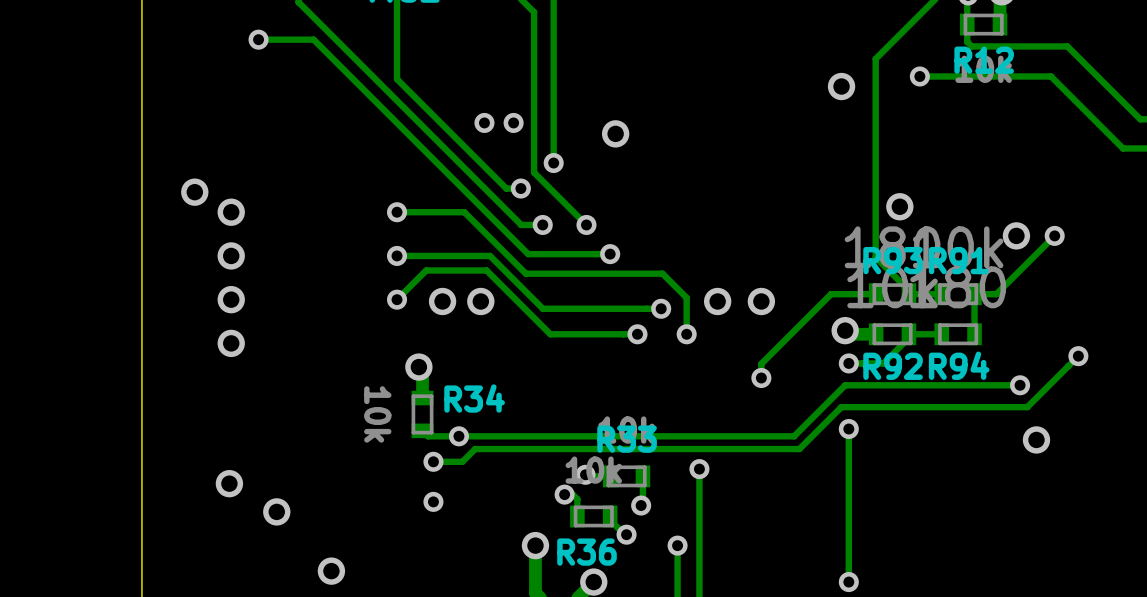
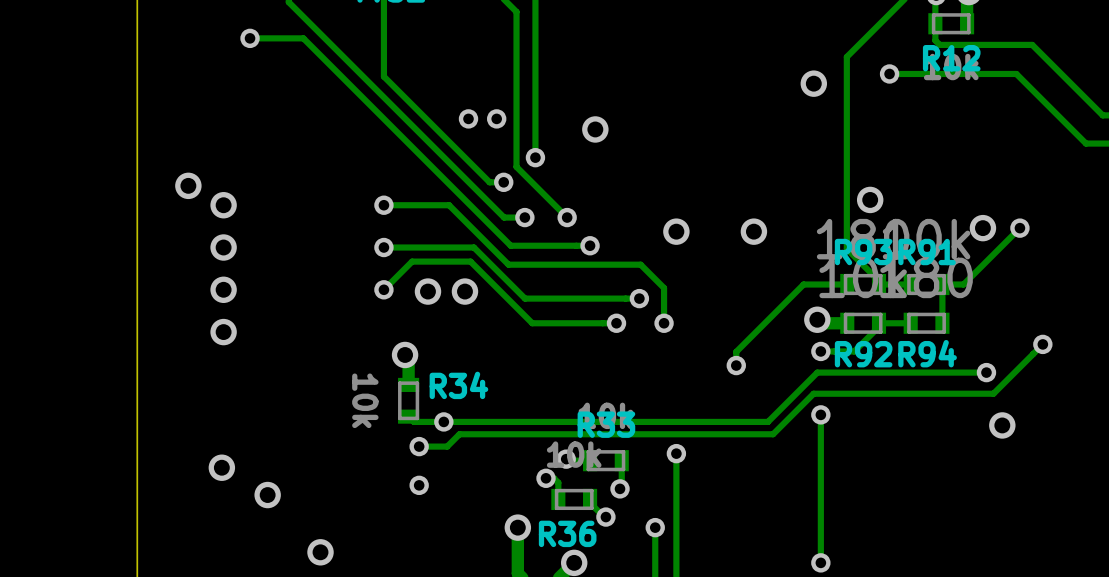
via: none -> (676, 231)
via: none -> (753, 231)
via: (717, 301) -> none
via: (761, 301) -> none

